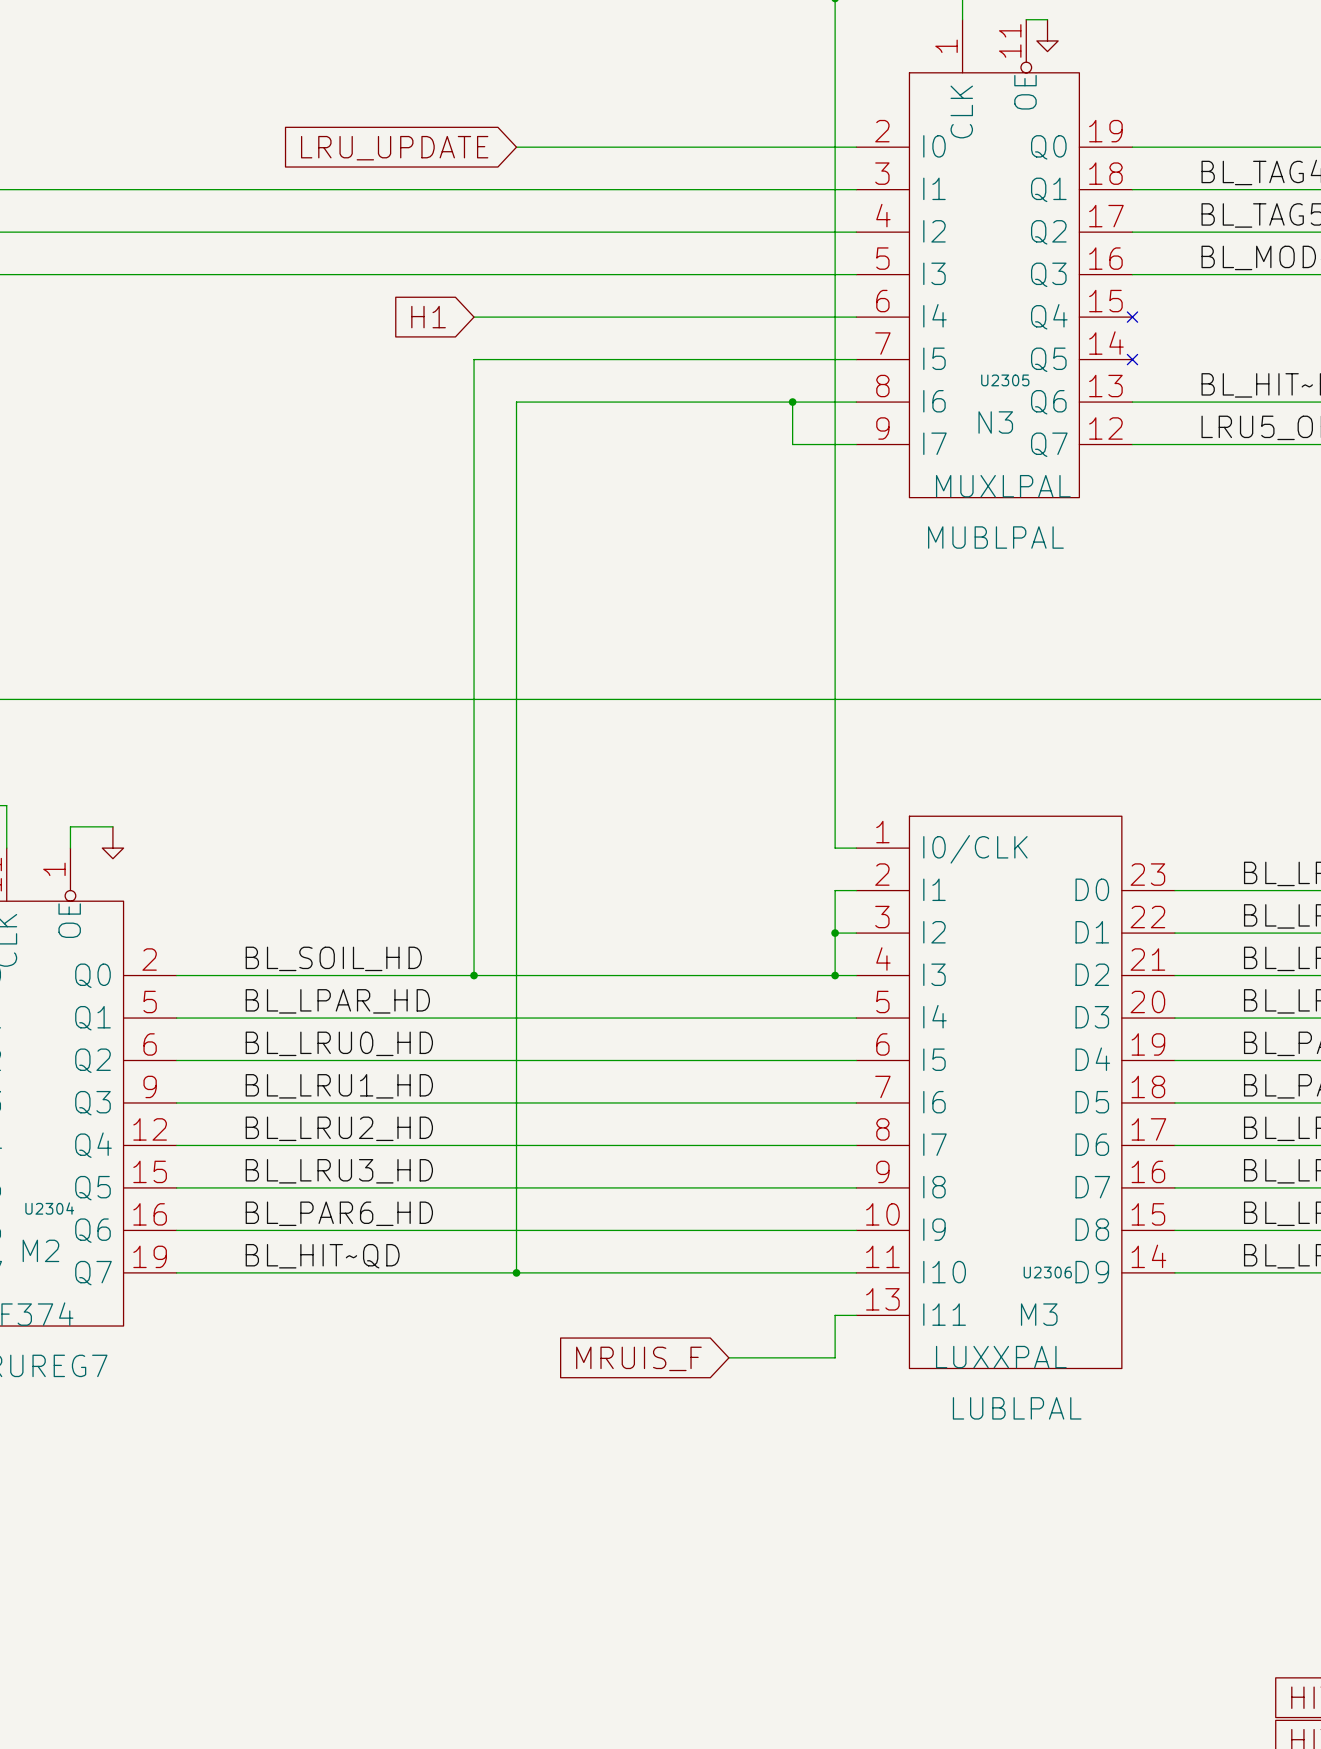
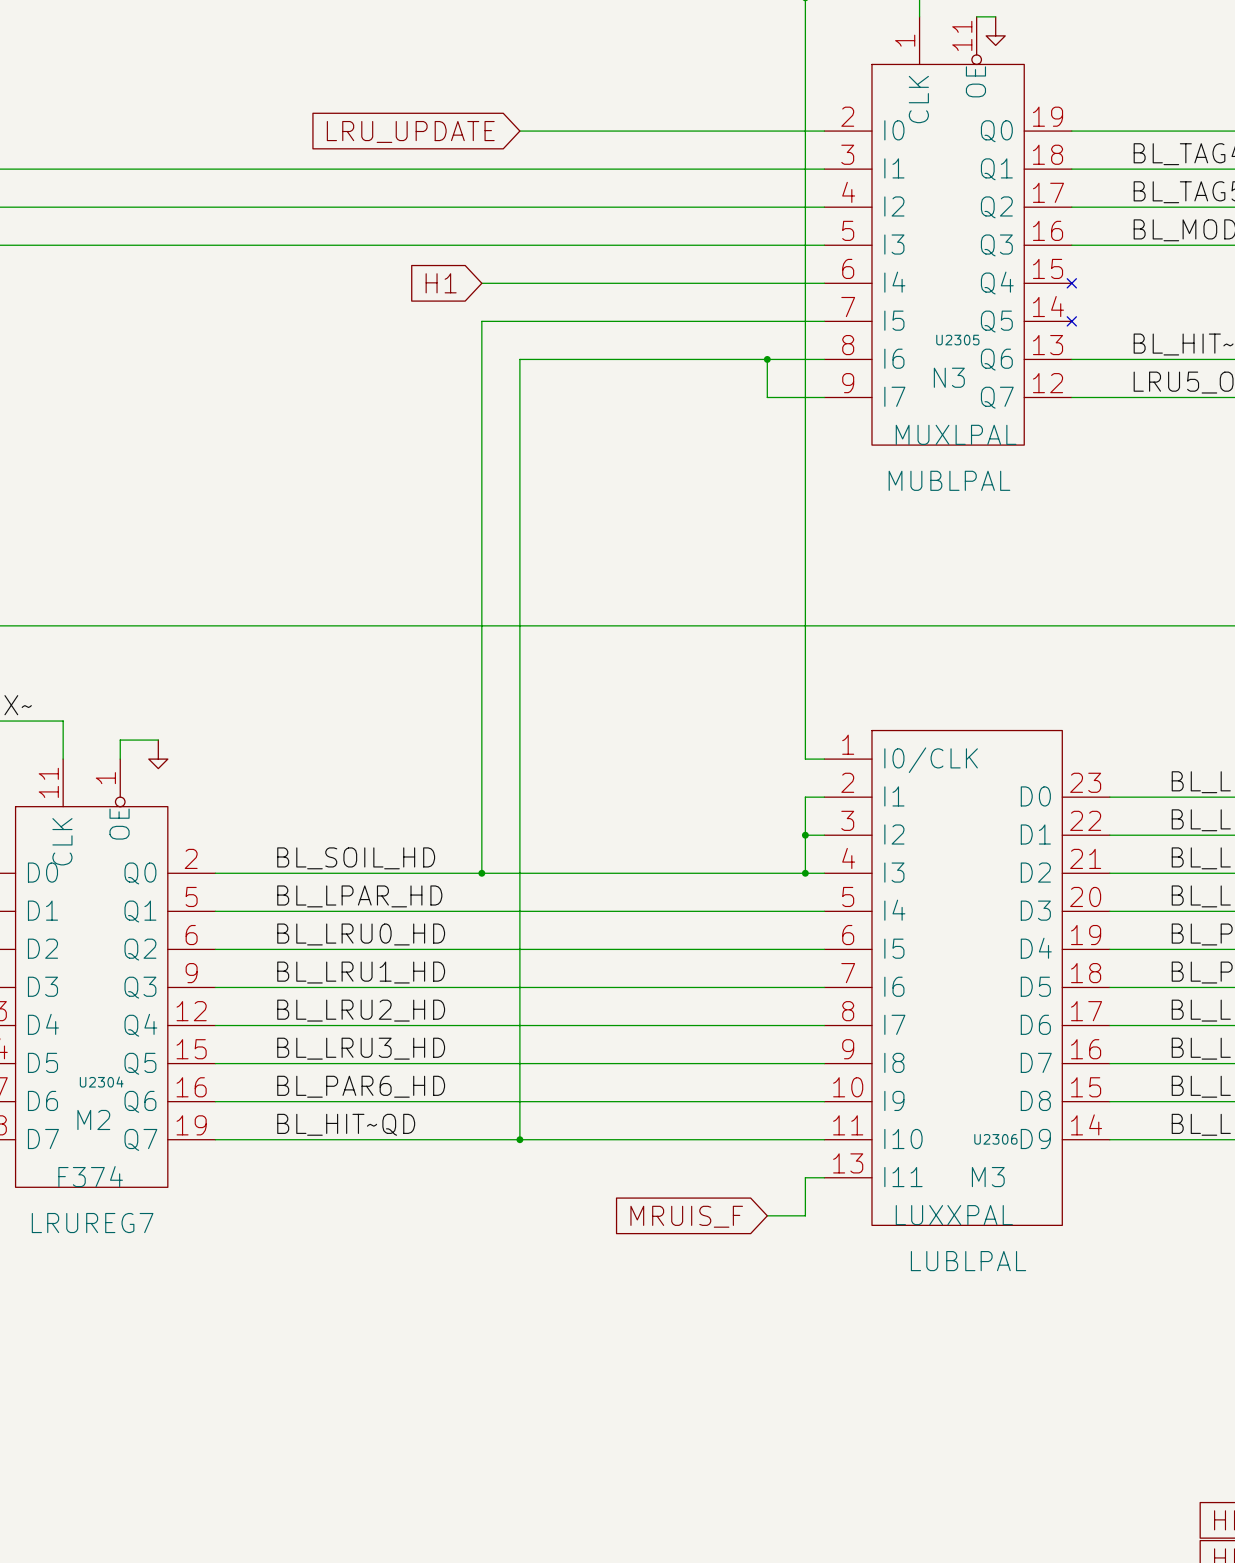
wire: (728, 1357) (792, 1357) -> none
global label position: MRUIS_F (638, 1358) -> MRUIS_F (686, 1216)

